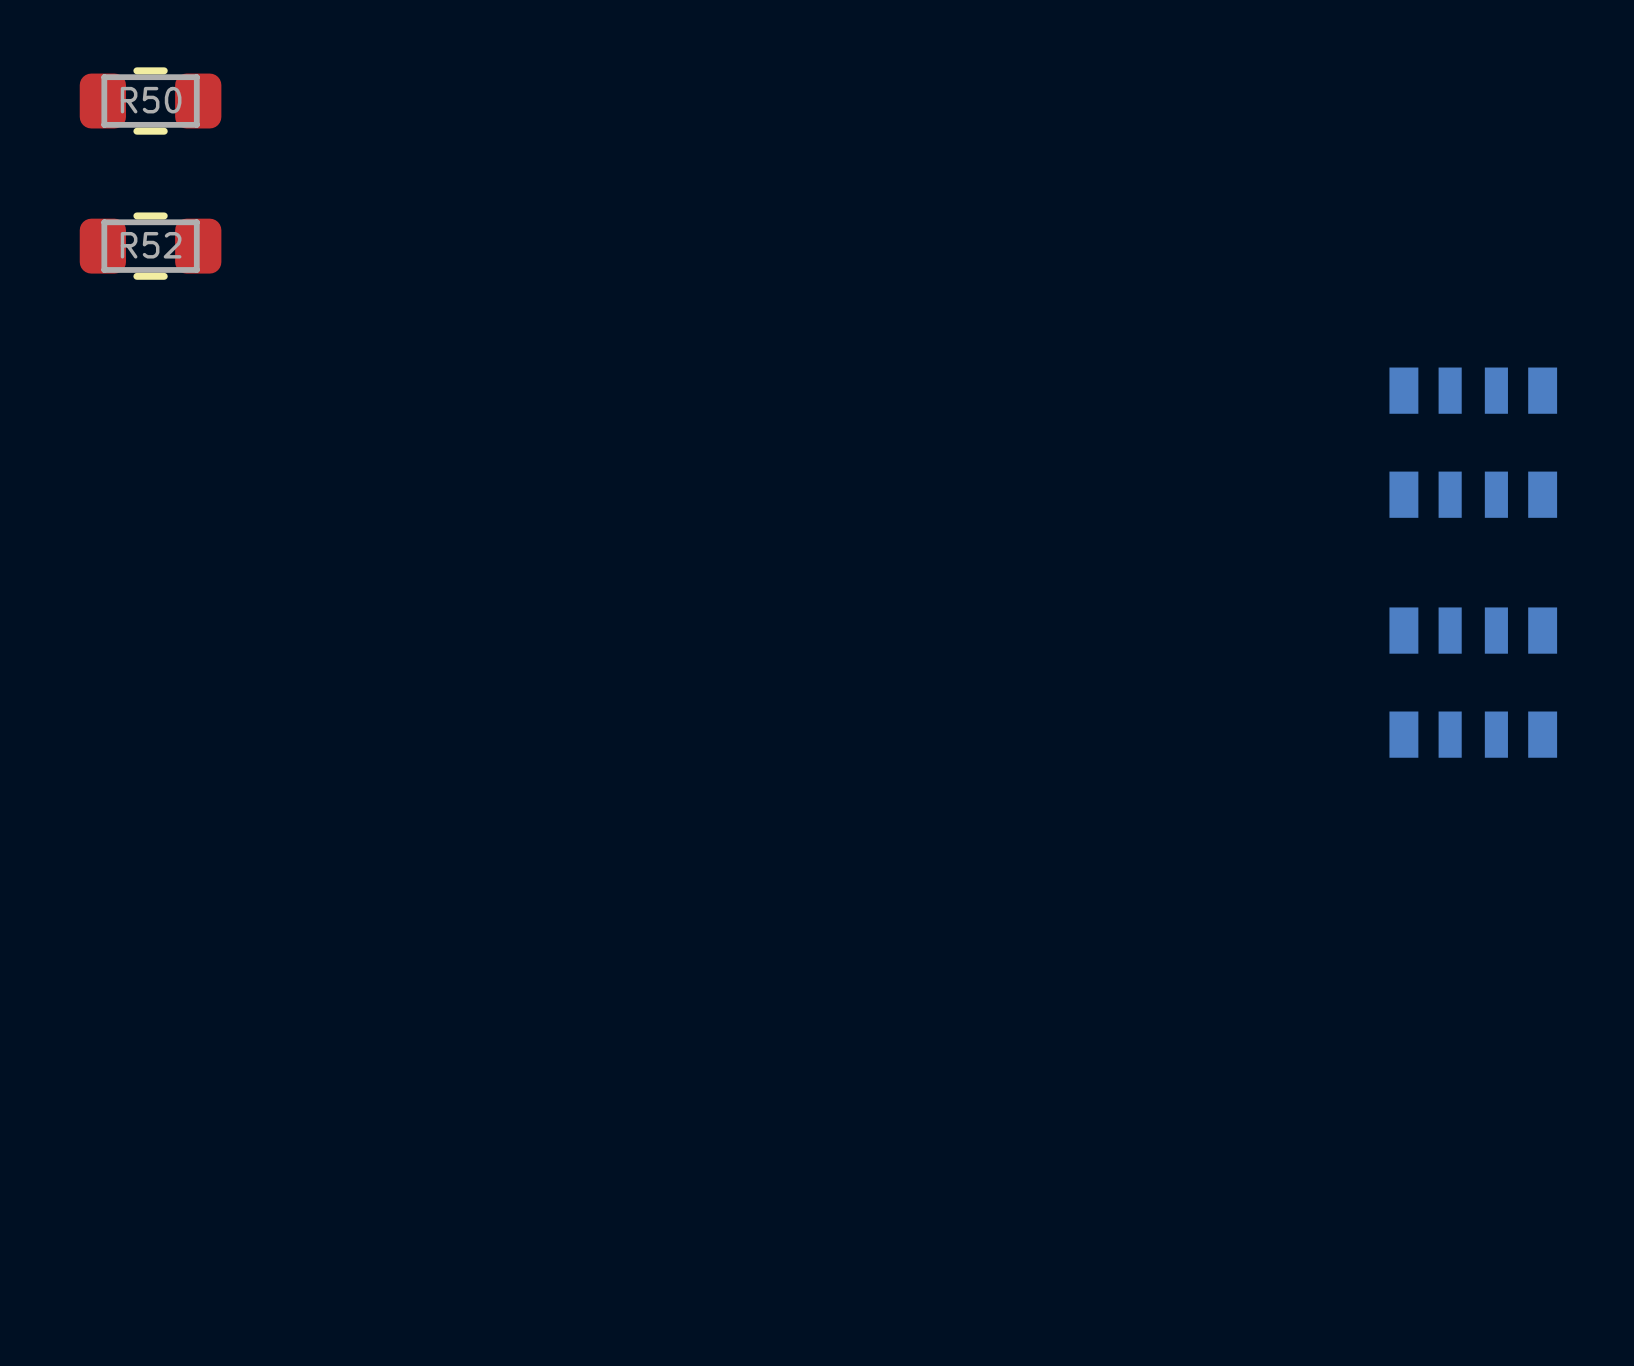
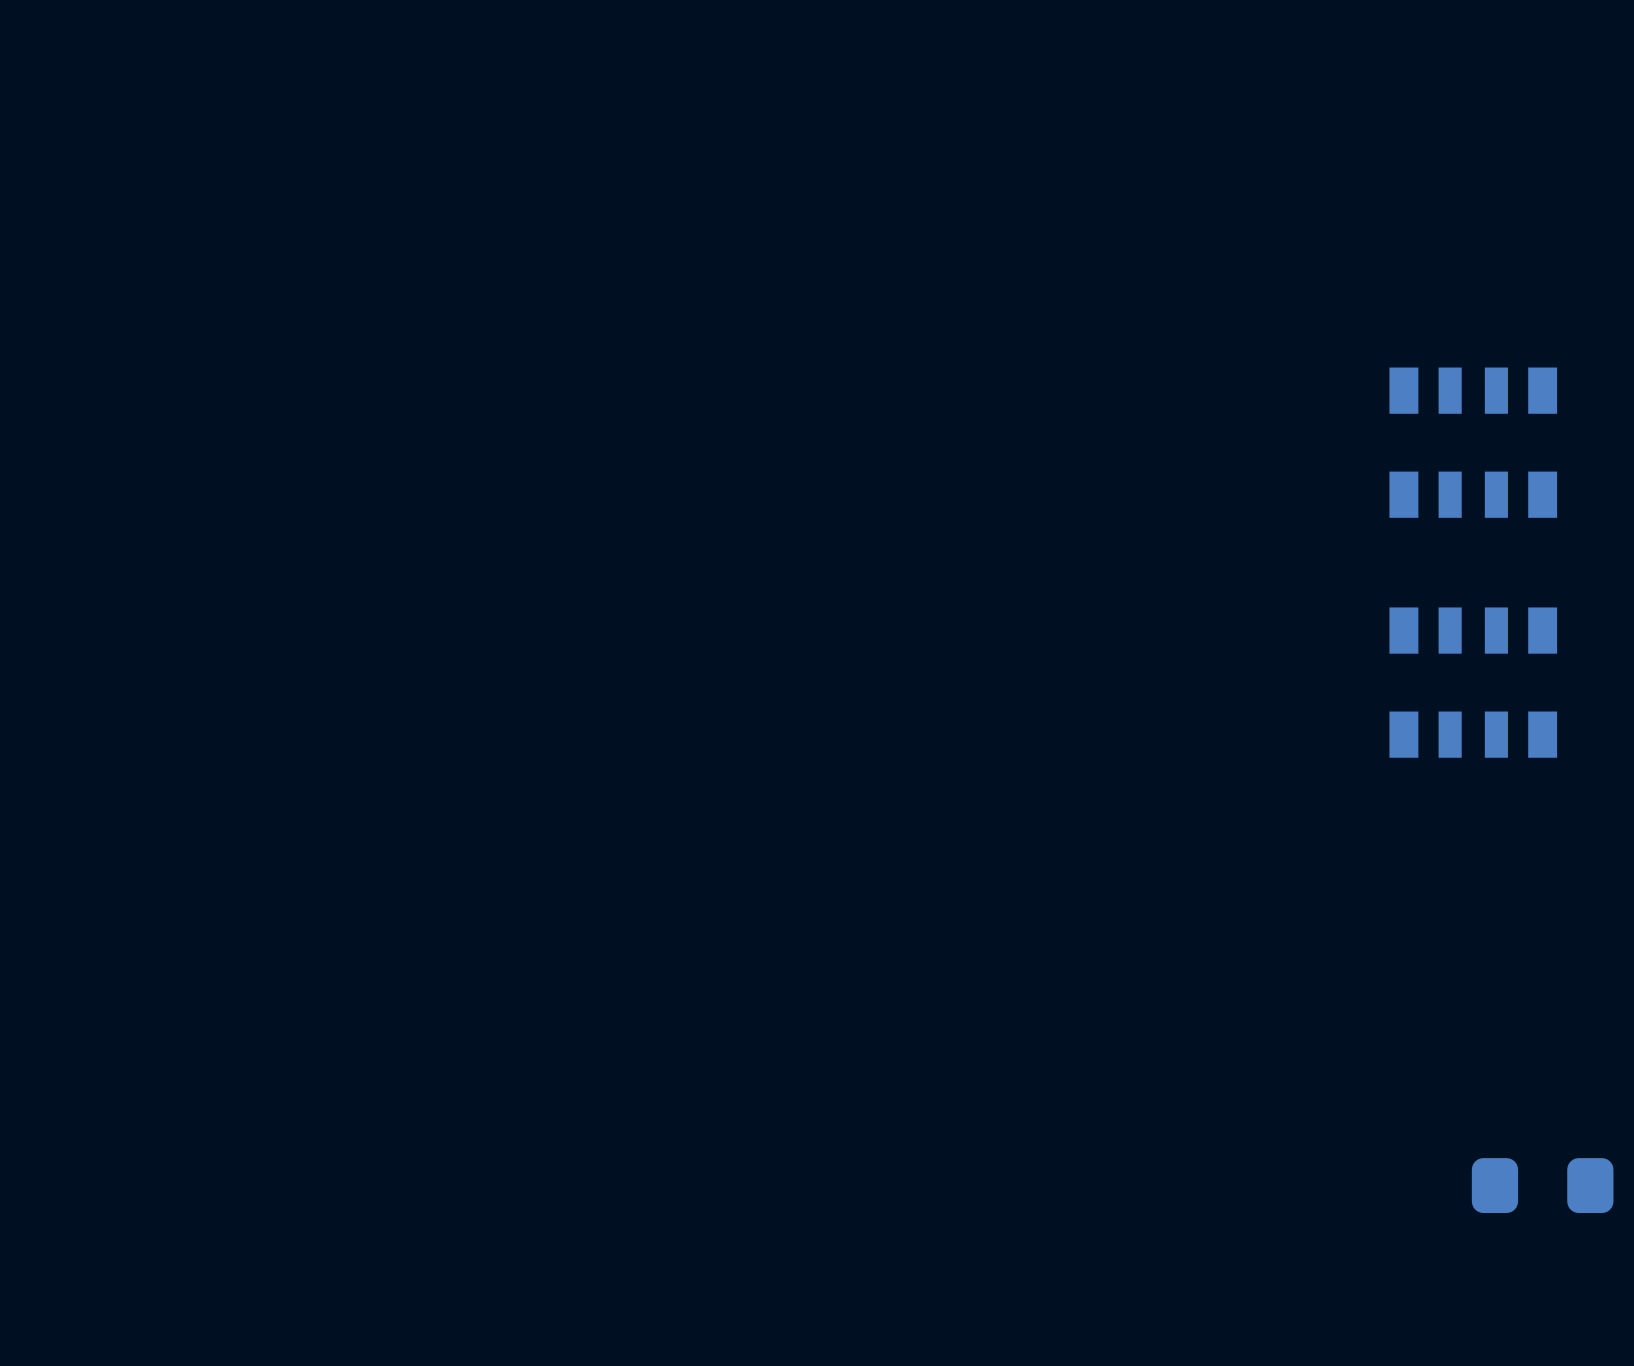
R50: (150, 101) -> none
R52: (150, 246) -> none
part: none -> (1542, 1185)

